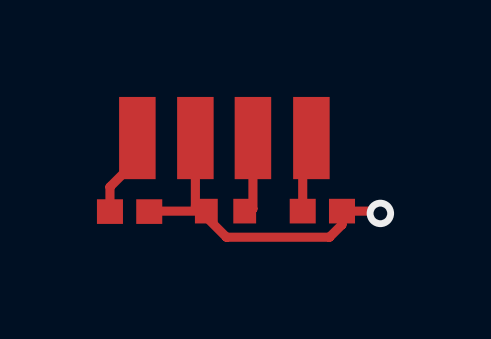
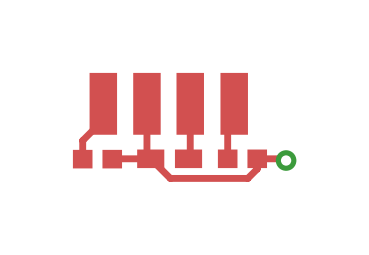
part footprint: [194, 198, 257, 224] -> [137, 149, 203, 169]

